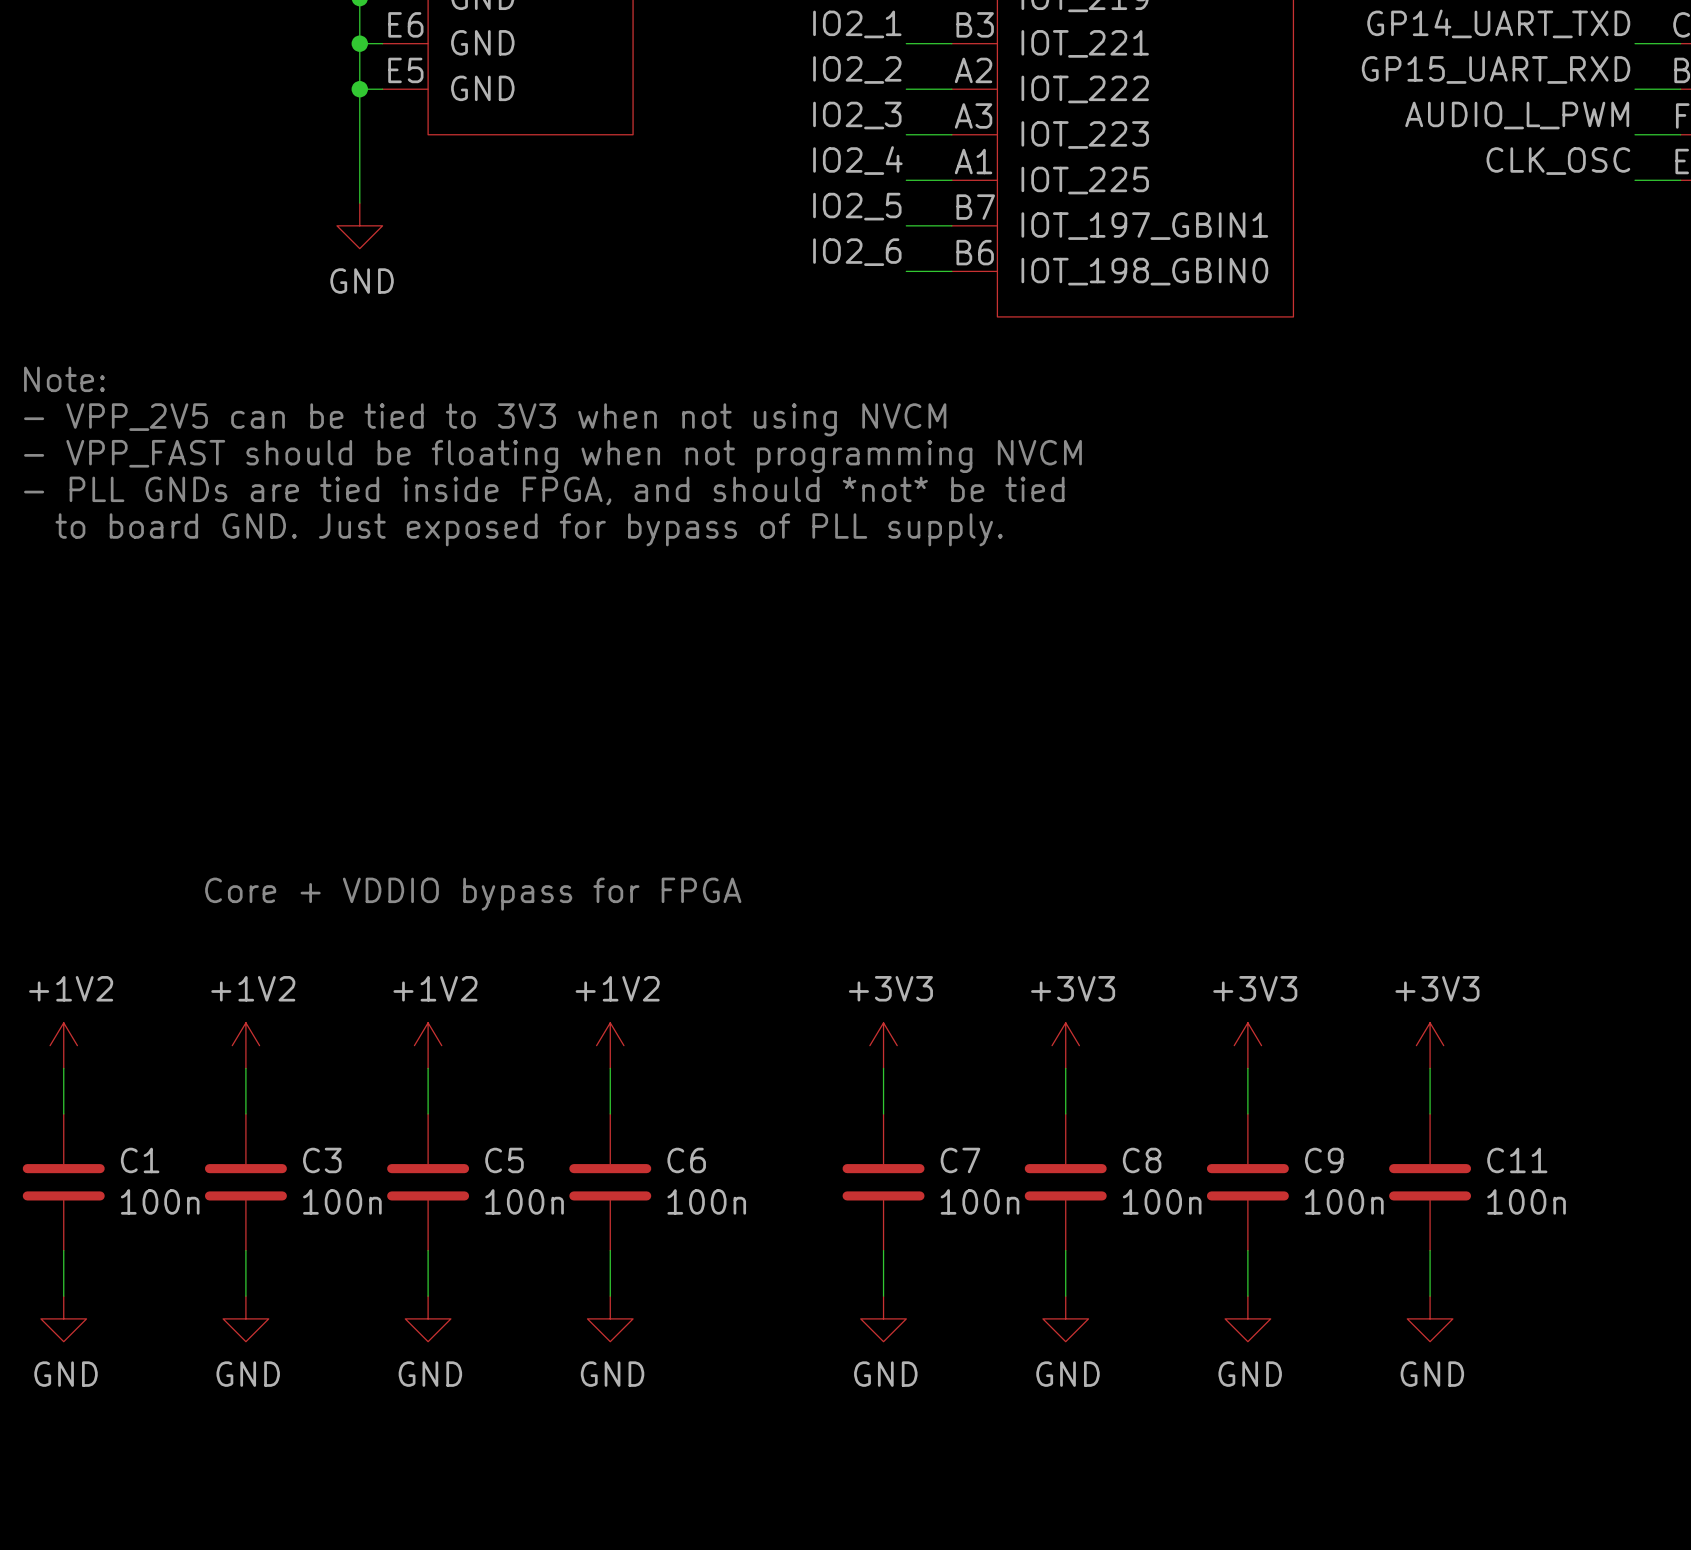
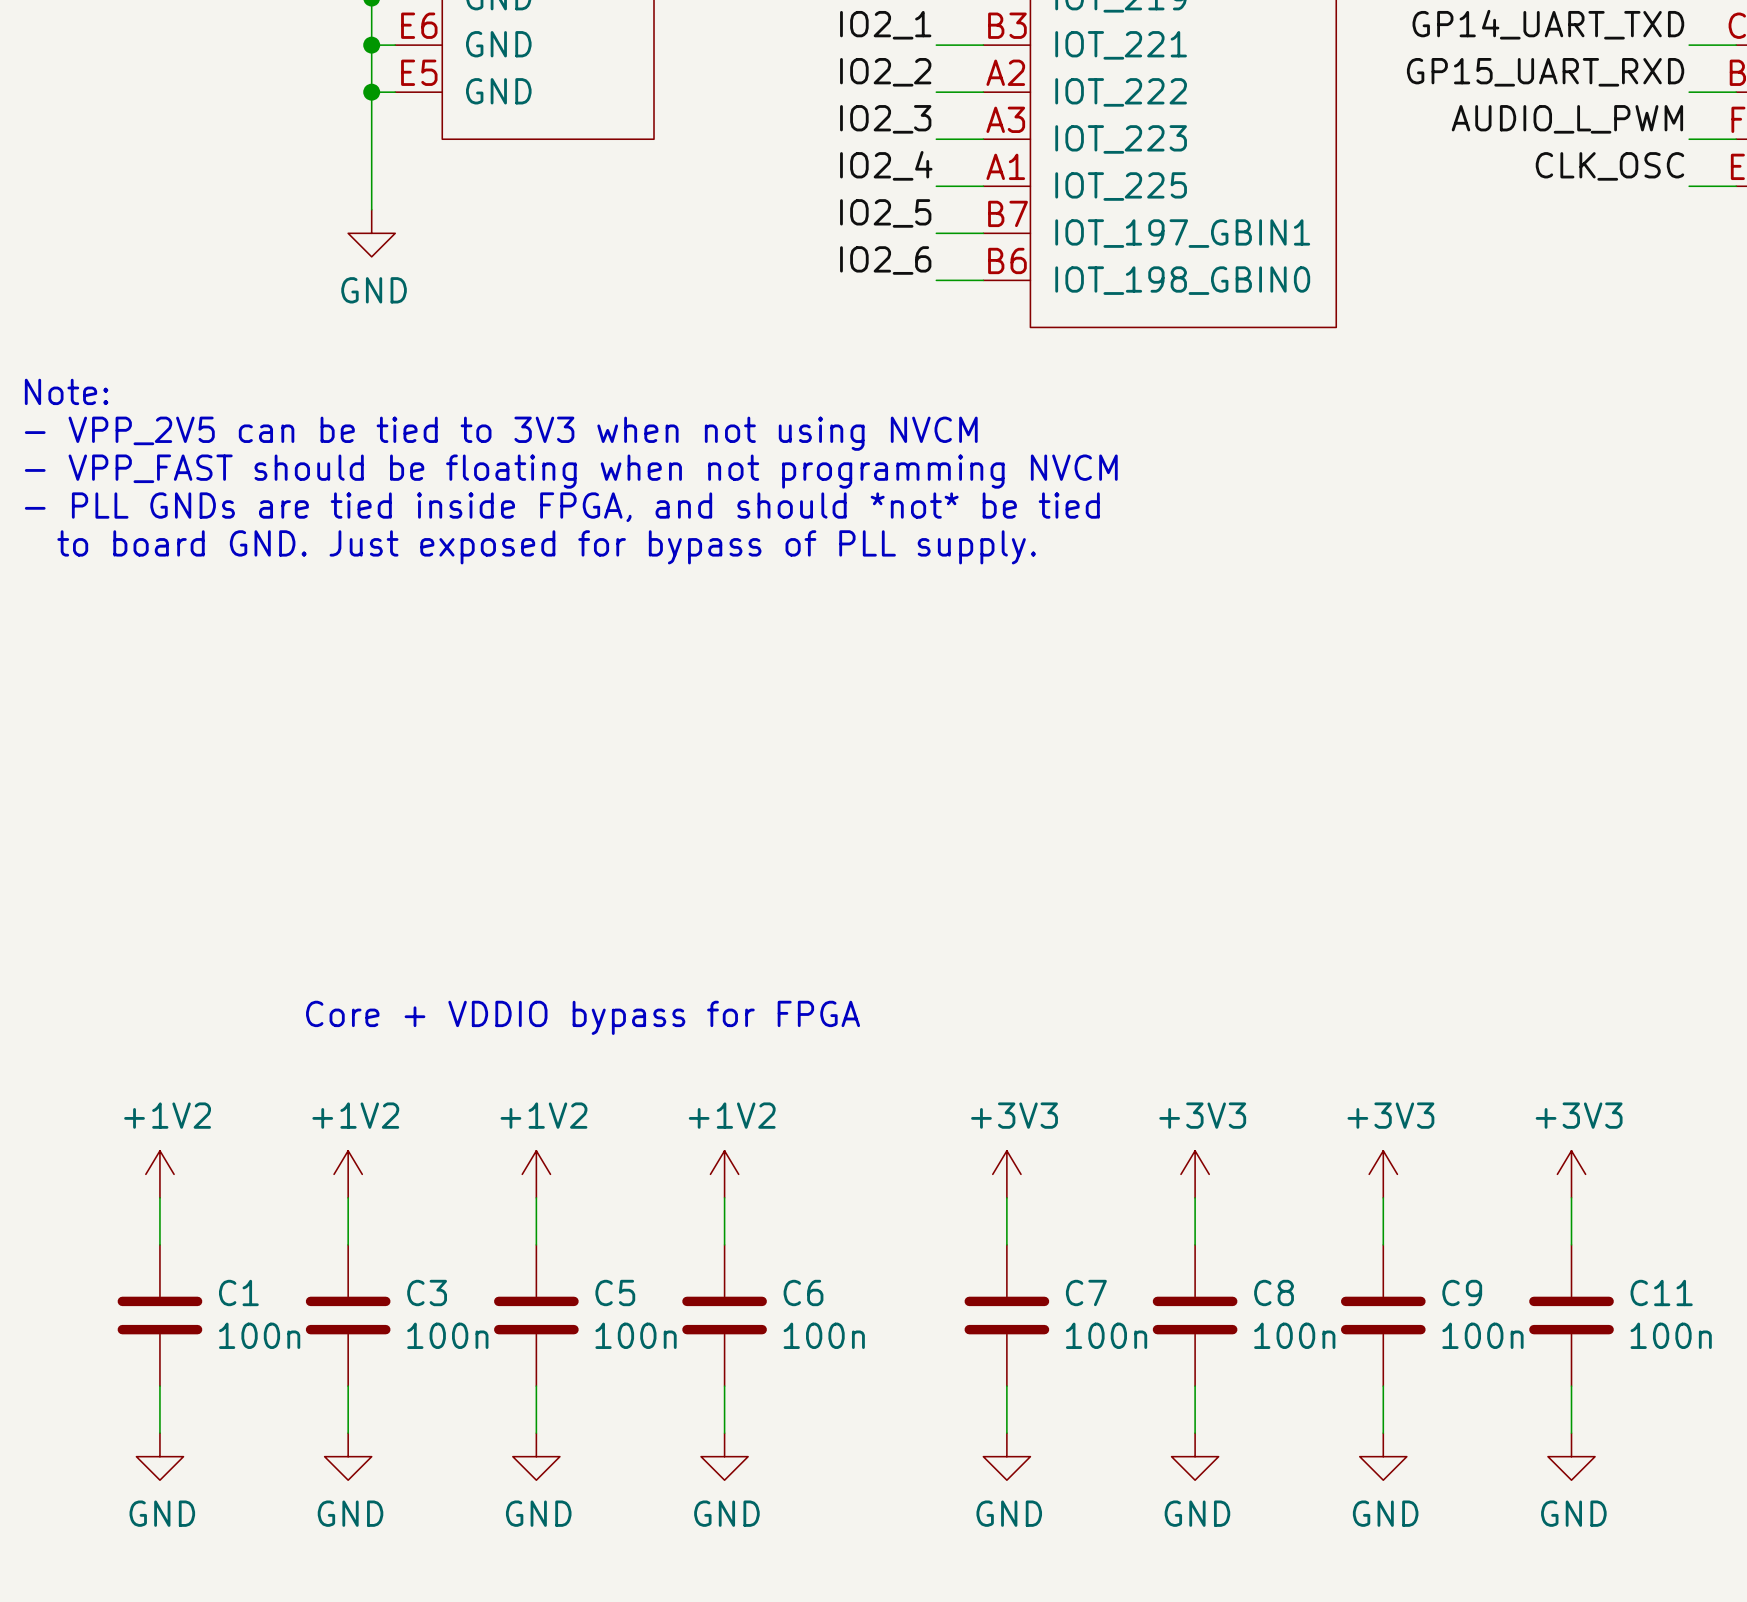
text position: Core + VDDIO bypass for FPGA (473, 894) -> Core + VDDIO bypass for FPGA (583, 1017)
power symbol: +1V2 (63, 1045) -> none
power symbol: +1V2 (245, 1045) -> none
power symbol: +1V2 (428, 1045) -> none
power symbol: +1V2 (610, 1045) -> none
power symbol: +3V3 (883, 1045) -> none
power symbol: +3V3 (1065, 1045) -> none
power symbol: +3V3 (1247, 1045) -> none
power symbol: +3V3 (1430, 1045) -> none
wire: (63, 1068) (63, 1113) -> (159, 1197) (159, 1244)
wire: (245, 1068) (245, 1113) -> (348, 1197) (348, 1244)
wire: (428, 1068) (428, 1113) -> (536, 1197) (536, 1244)
wire: (610, 1068) (610, 1113) -> (724, 1197) (724, 1244)
wire: (883, 1068) (883, 1113) -> (1006, 1197) (1006, 1244)
wire: (1065, 1068) (1065, 1113) -> (1195, 1197) (1195, 1244)
wire: (1247, 1068) (1247, 1113) -> (1383, 1197) (1383, 1244)
wire: (1430, 1068) (1430, 1113) -> (1571, 1197) (1571, 1244)
power symbol: none -> +1V2 (159, 1174)
power symbol: none -> +1V2 (348, 1174)
power symbol: none -> +1V2 (536, 1174)
power symbol: none -> +1V2 (724, 1174)
power symbol: none -> +3V3 (1006, 1174)
power symbol: none -> +3V3 (1195, 1174)
power symbol: none -> +3V3 (1383, 1174)
power symbol: none -> +3V3 (1571, 1174)
C1 position: (63, 1182) -> (159, 1315)
C3 position: (245, 1182) -> (348, 1315)
C5 position: (428, 1182) -> (536, 1315)
C6 position: (610, 1182) -> (724, 1315)
C7 position: (883, 1182) -> (1006, 1315)
C8 position: (1065, 1182) -> (1195, 1315)
C9 position: (1247, 1182) -> (1383, 1315)
C11 position: (1430, 1182) -> (1571, 1315)
wire: (63, 1250) (63, 1296) -> (159, 1386) (159, 1433)
wire: (245, 1250) (245, 1296) -> (348, 1386) (348, 1433)
wire: (428, 1250) (428, 1296) -> (536, 1386) (536, 1433)
wire: (610, 1250) (610, 1296) -> (724, 1386) (724, 1433)
wire: (883, 1250) (883, 1296) -> (1006, 1386) (1006, 1433)
wire: (1065, 1250) (1065, 1296) -> (1195, 1386) (1195, 1433)
wire: (1247, 1250) (1247, 1296) -> (1383, 1386) (1383, 1433)
wire: (1430, 1250) (1430, 1296) -> (1571, 1386) (1571, 1433)
power symbol: GND (63, 1318) -> none
power symbol: GND (245, 1318) -> none
power symbol: GND (428, 1318) -> none
power symbol: GND (610, 1318) -> none
power symbol: GND (883, 1318) -> none
power symbol: GND (1065, 1318) -> none
power symbol: GND (1247, 1318) -> none
power symbol: GND (1430, 1318) -> none
power symbol: none -> GND (159, 1456)
power symbol: none -> GND (348, 1456)
power symbol: none -> GND (536, 1456)
power symbol: none -> GND (724, 1456)
power symbol: none -> GND (1006, 1456)
power symbol: none -> GND (1195, 1456)
power symbol: none -> GND (1383, 1456)
power symbol: none -> GND (1571, 1456)

